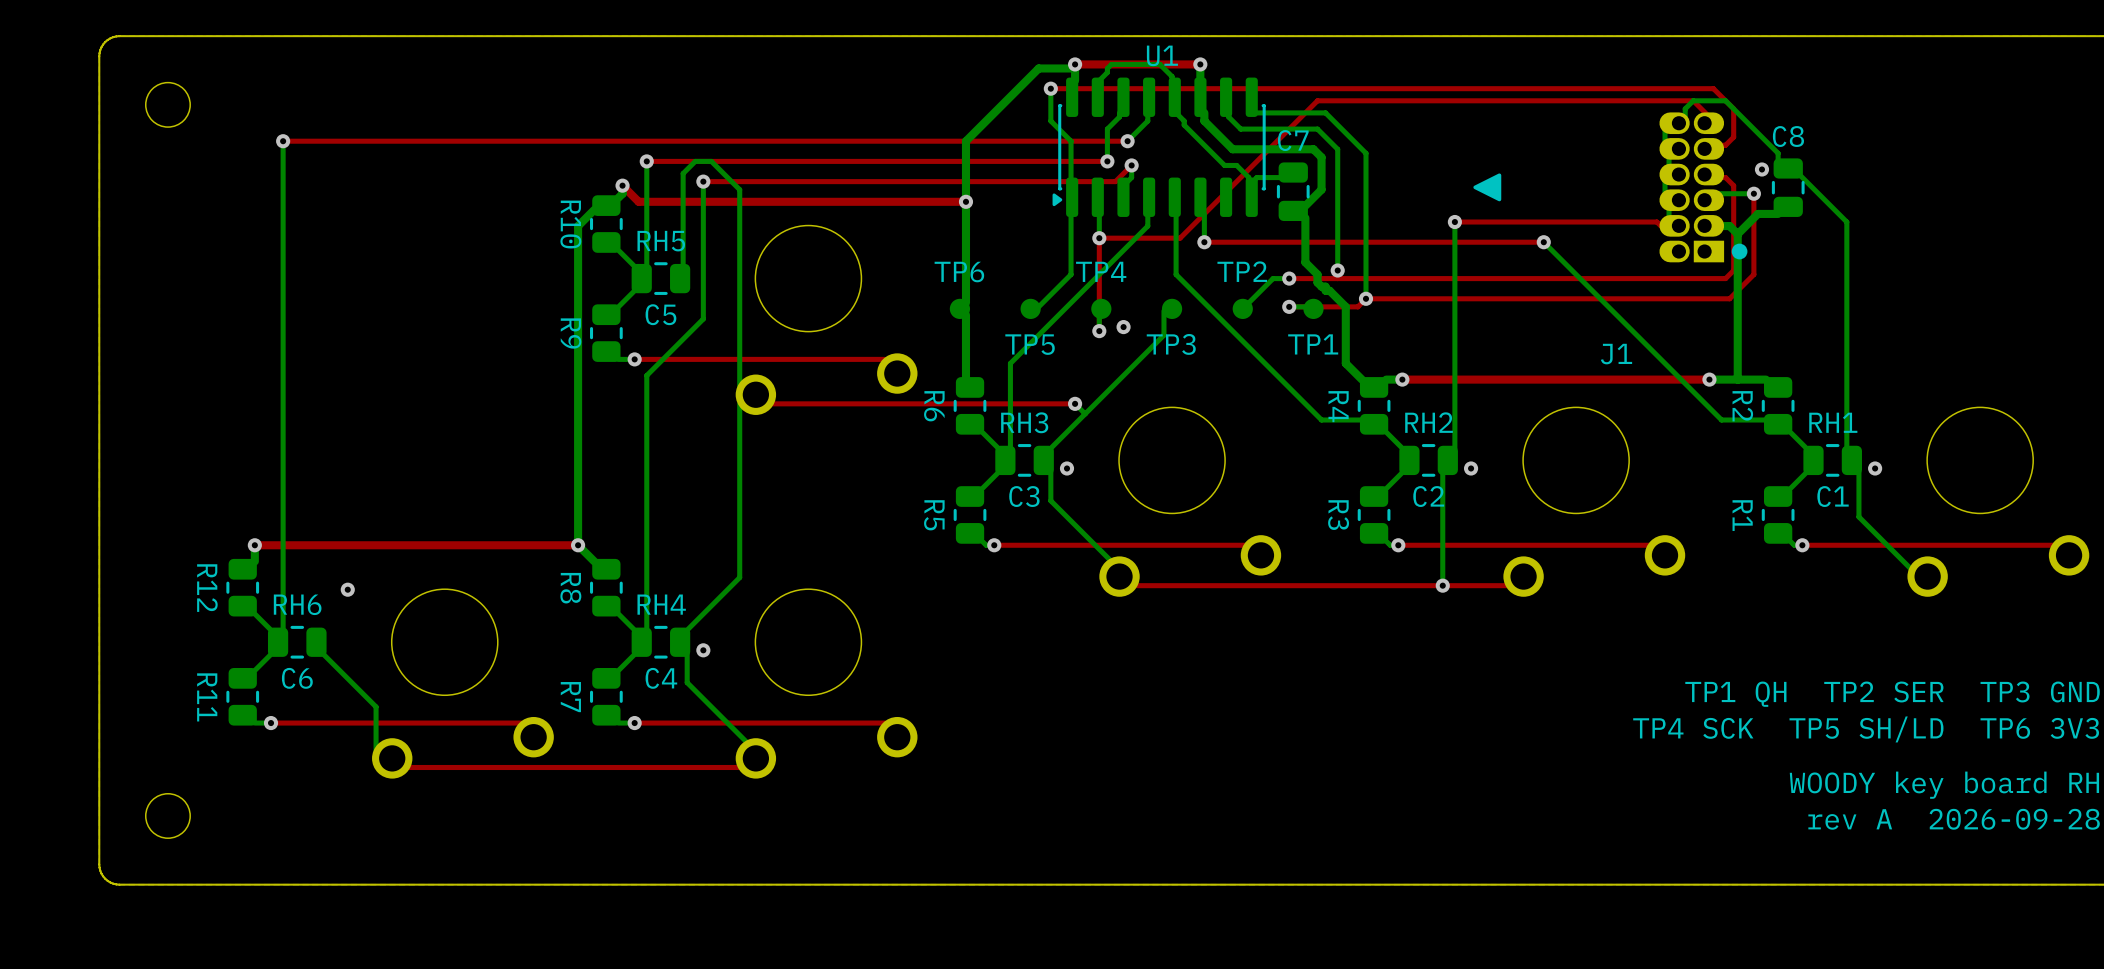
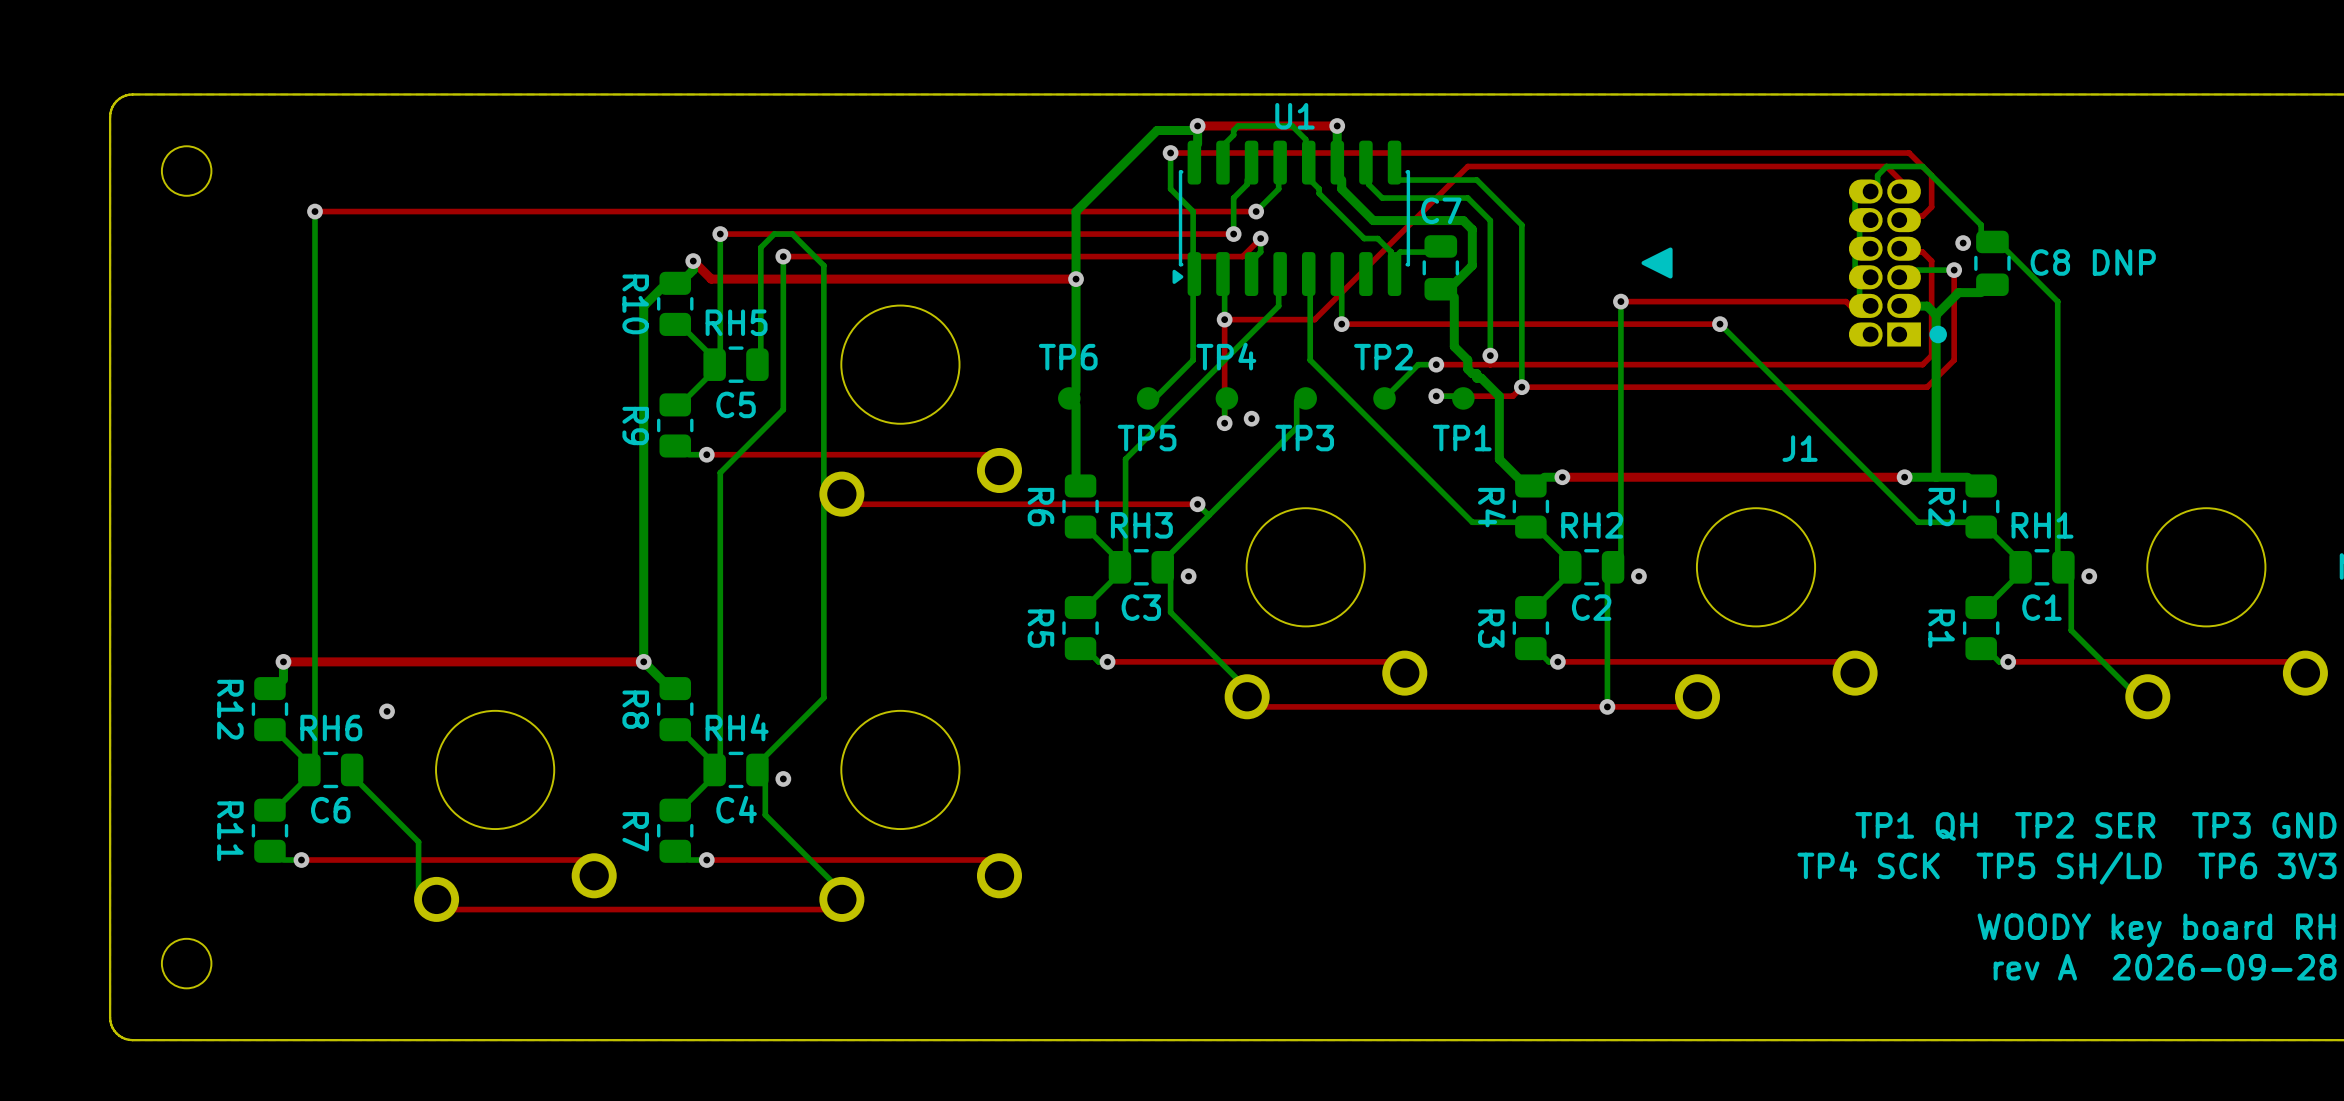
text: C8 (1788, 136) -> none
text: none -> C8 DNP (2093, 262)

